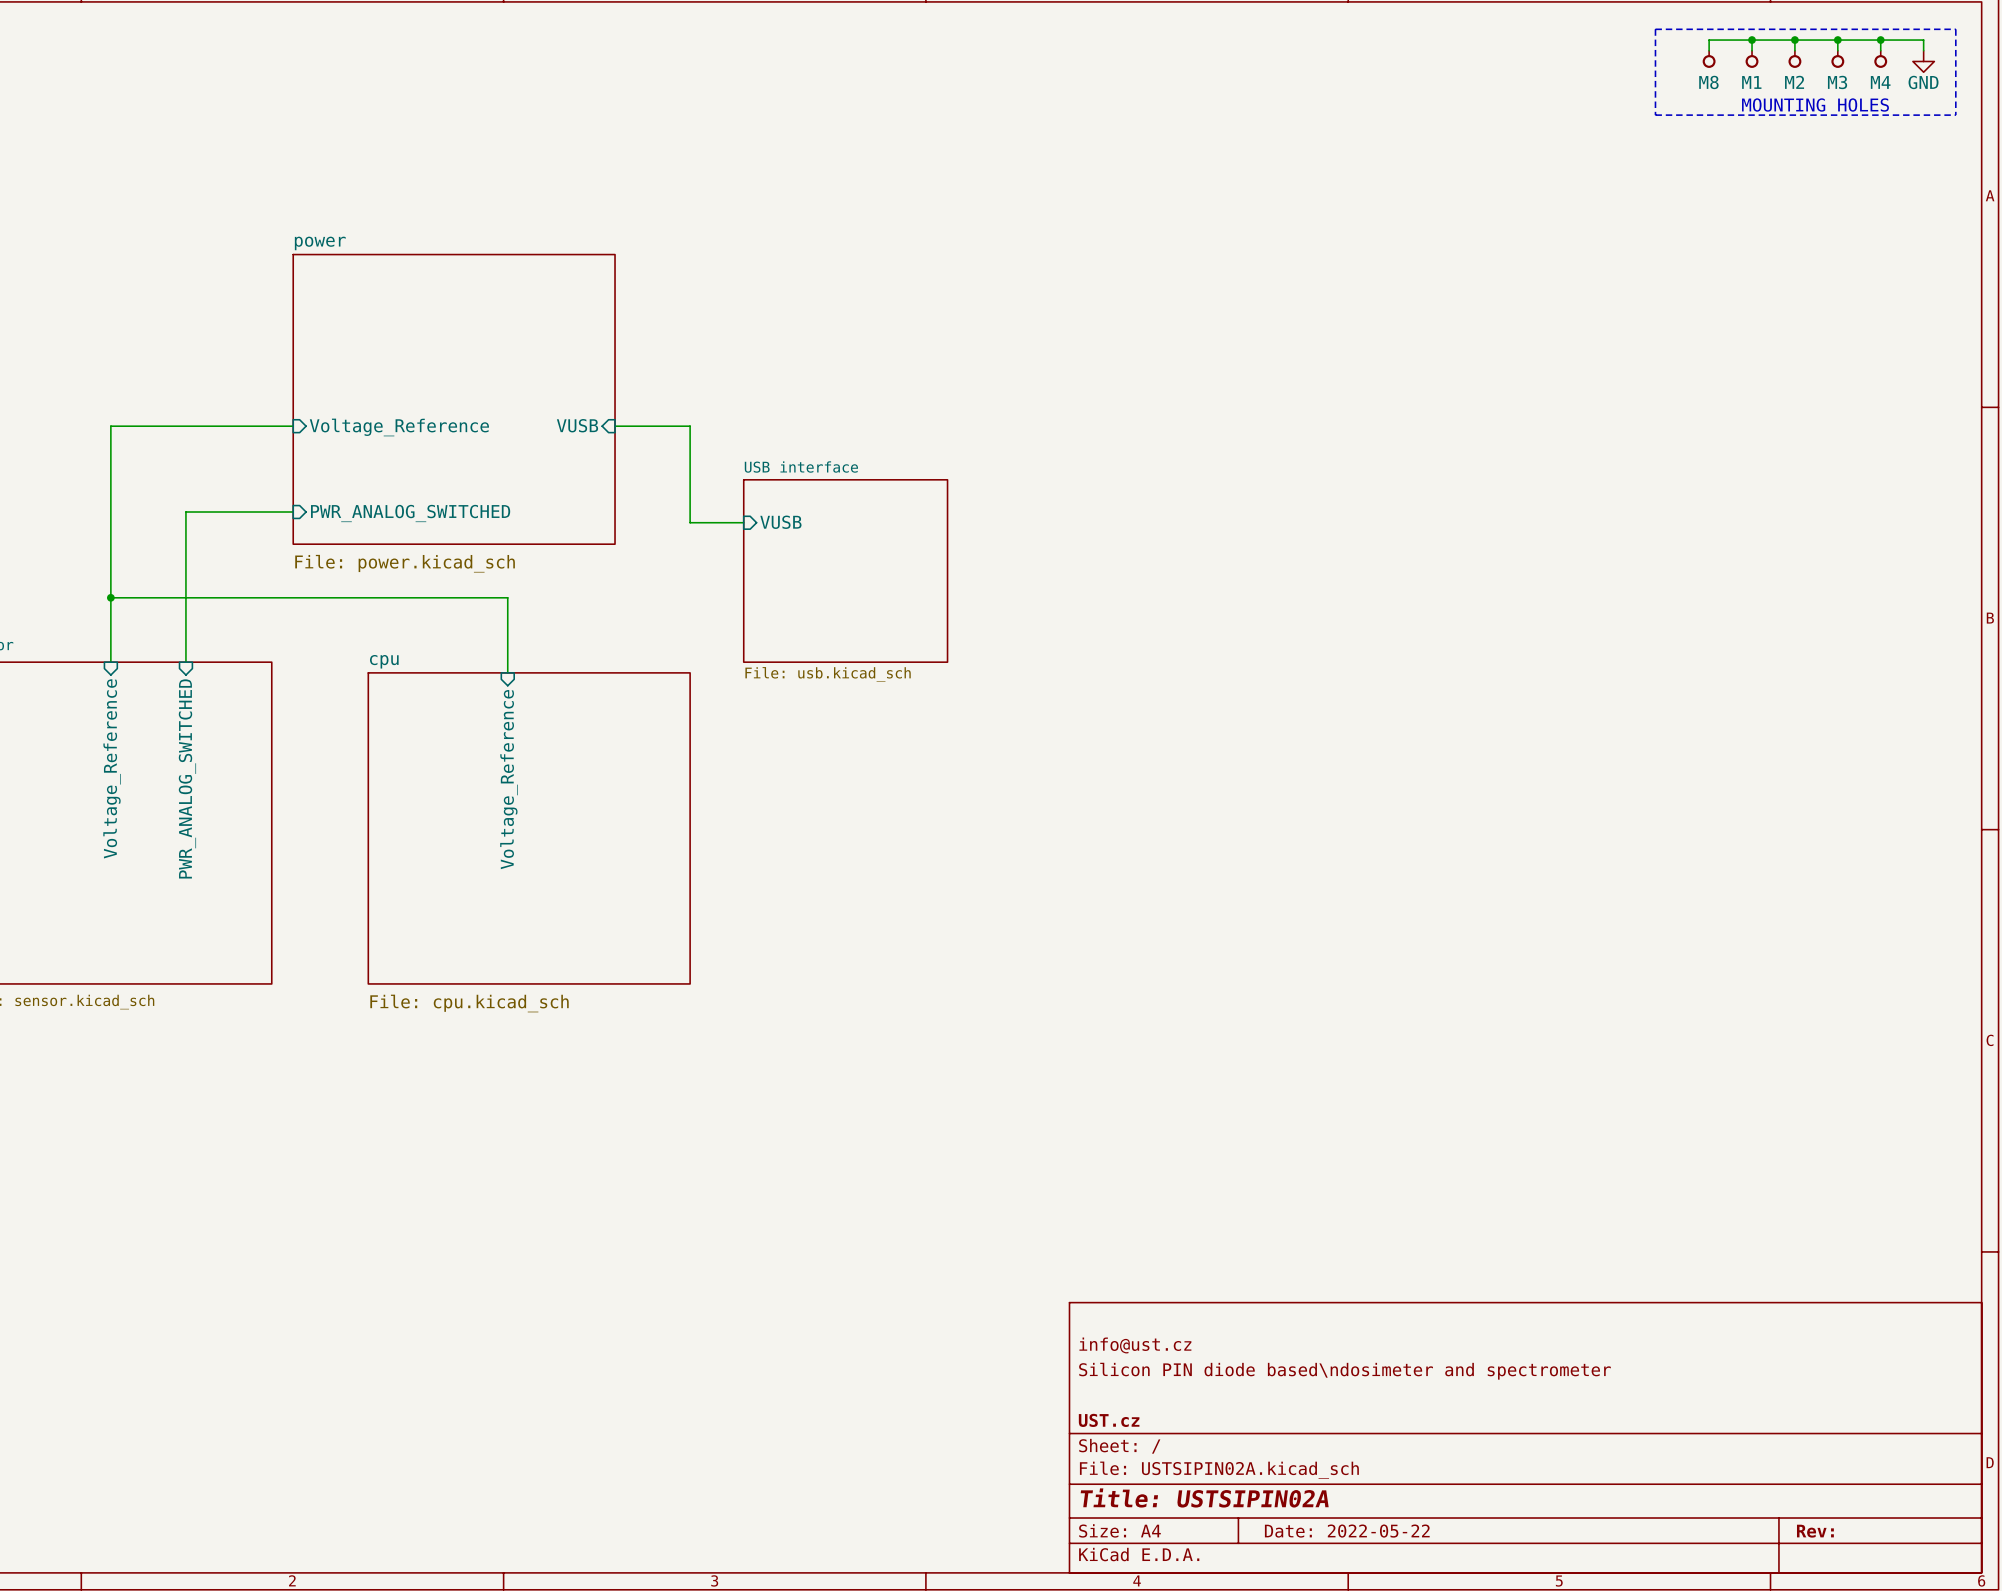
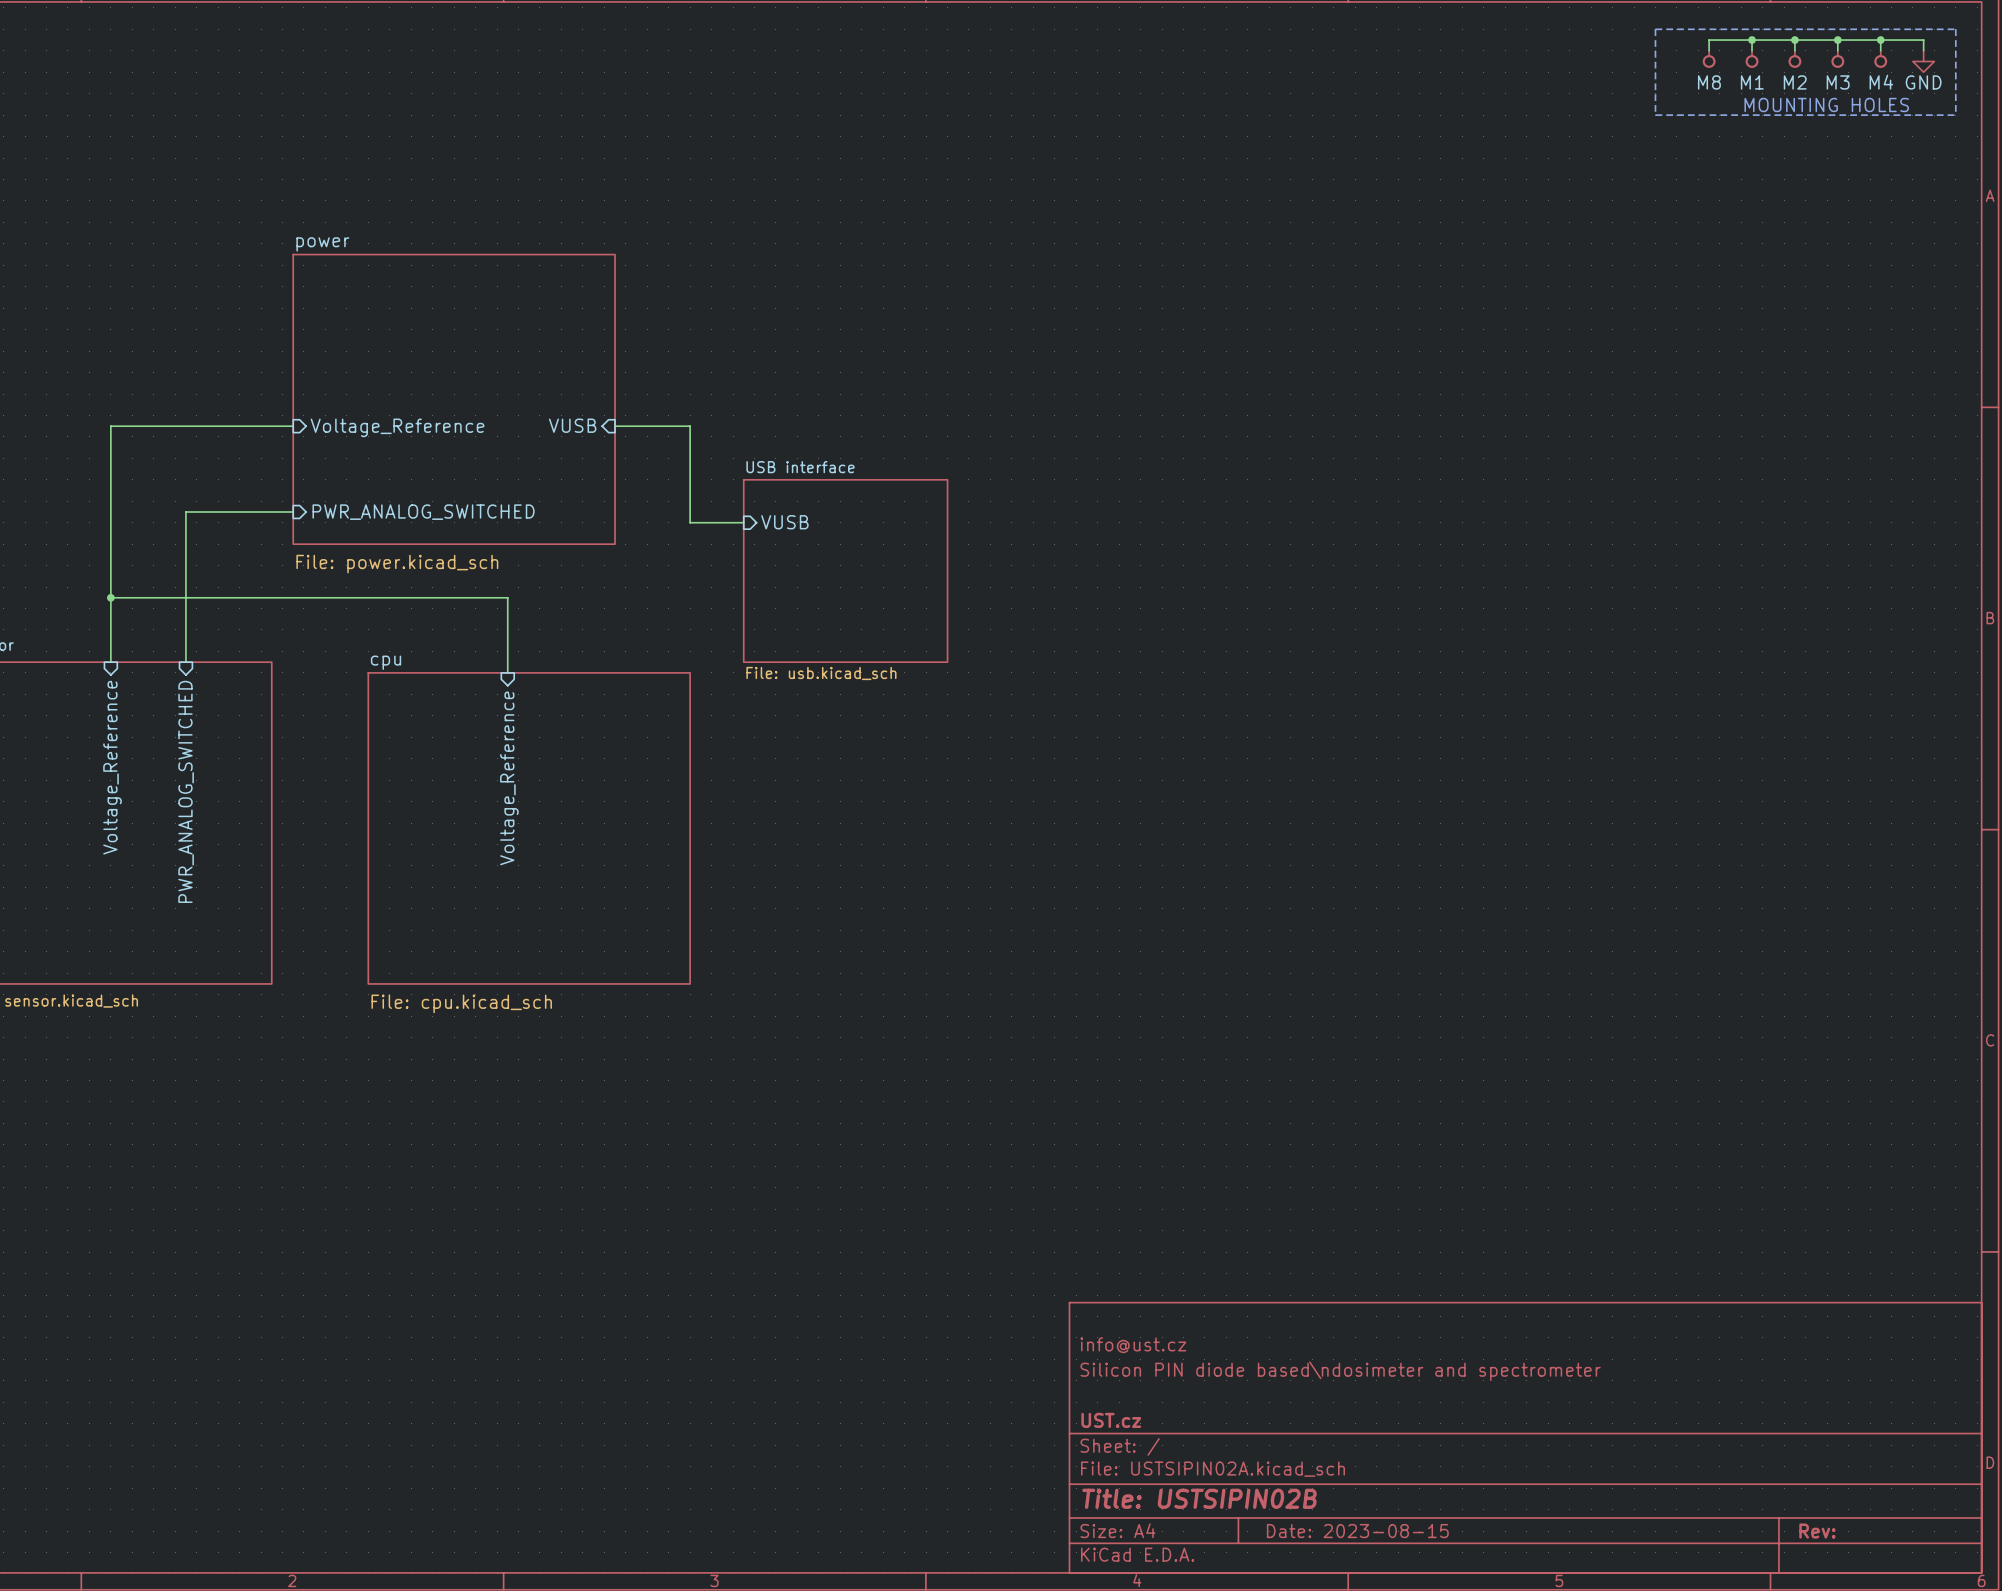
title block: Title: USTSIPIN02A (1204, 1497) -> Title: USTSIPIN02B (1199, 1498)
title block: Date: 2022-05-22 (1347, 1531) -> Date: 2023-08-15 (1357, 1531)

